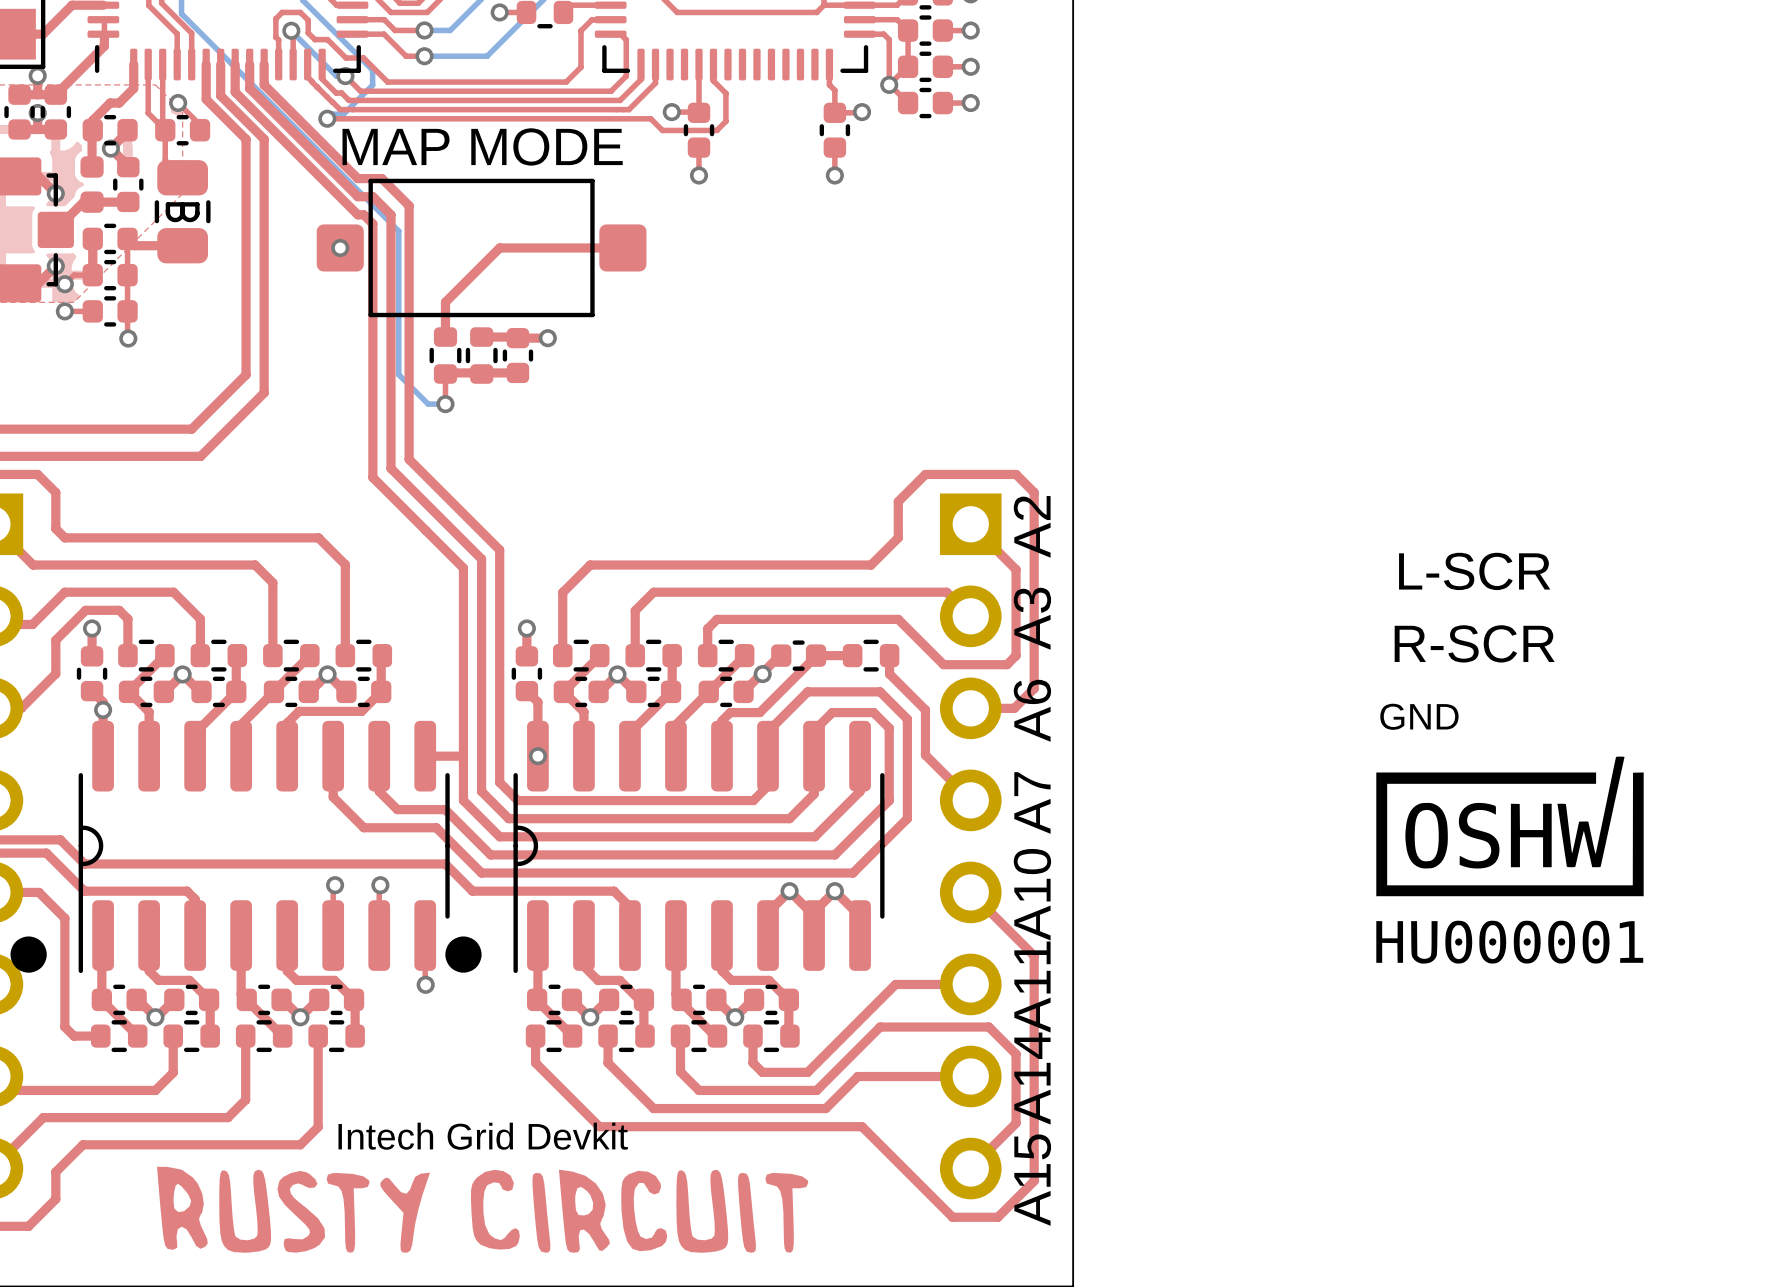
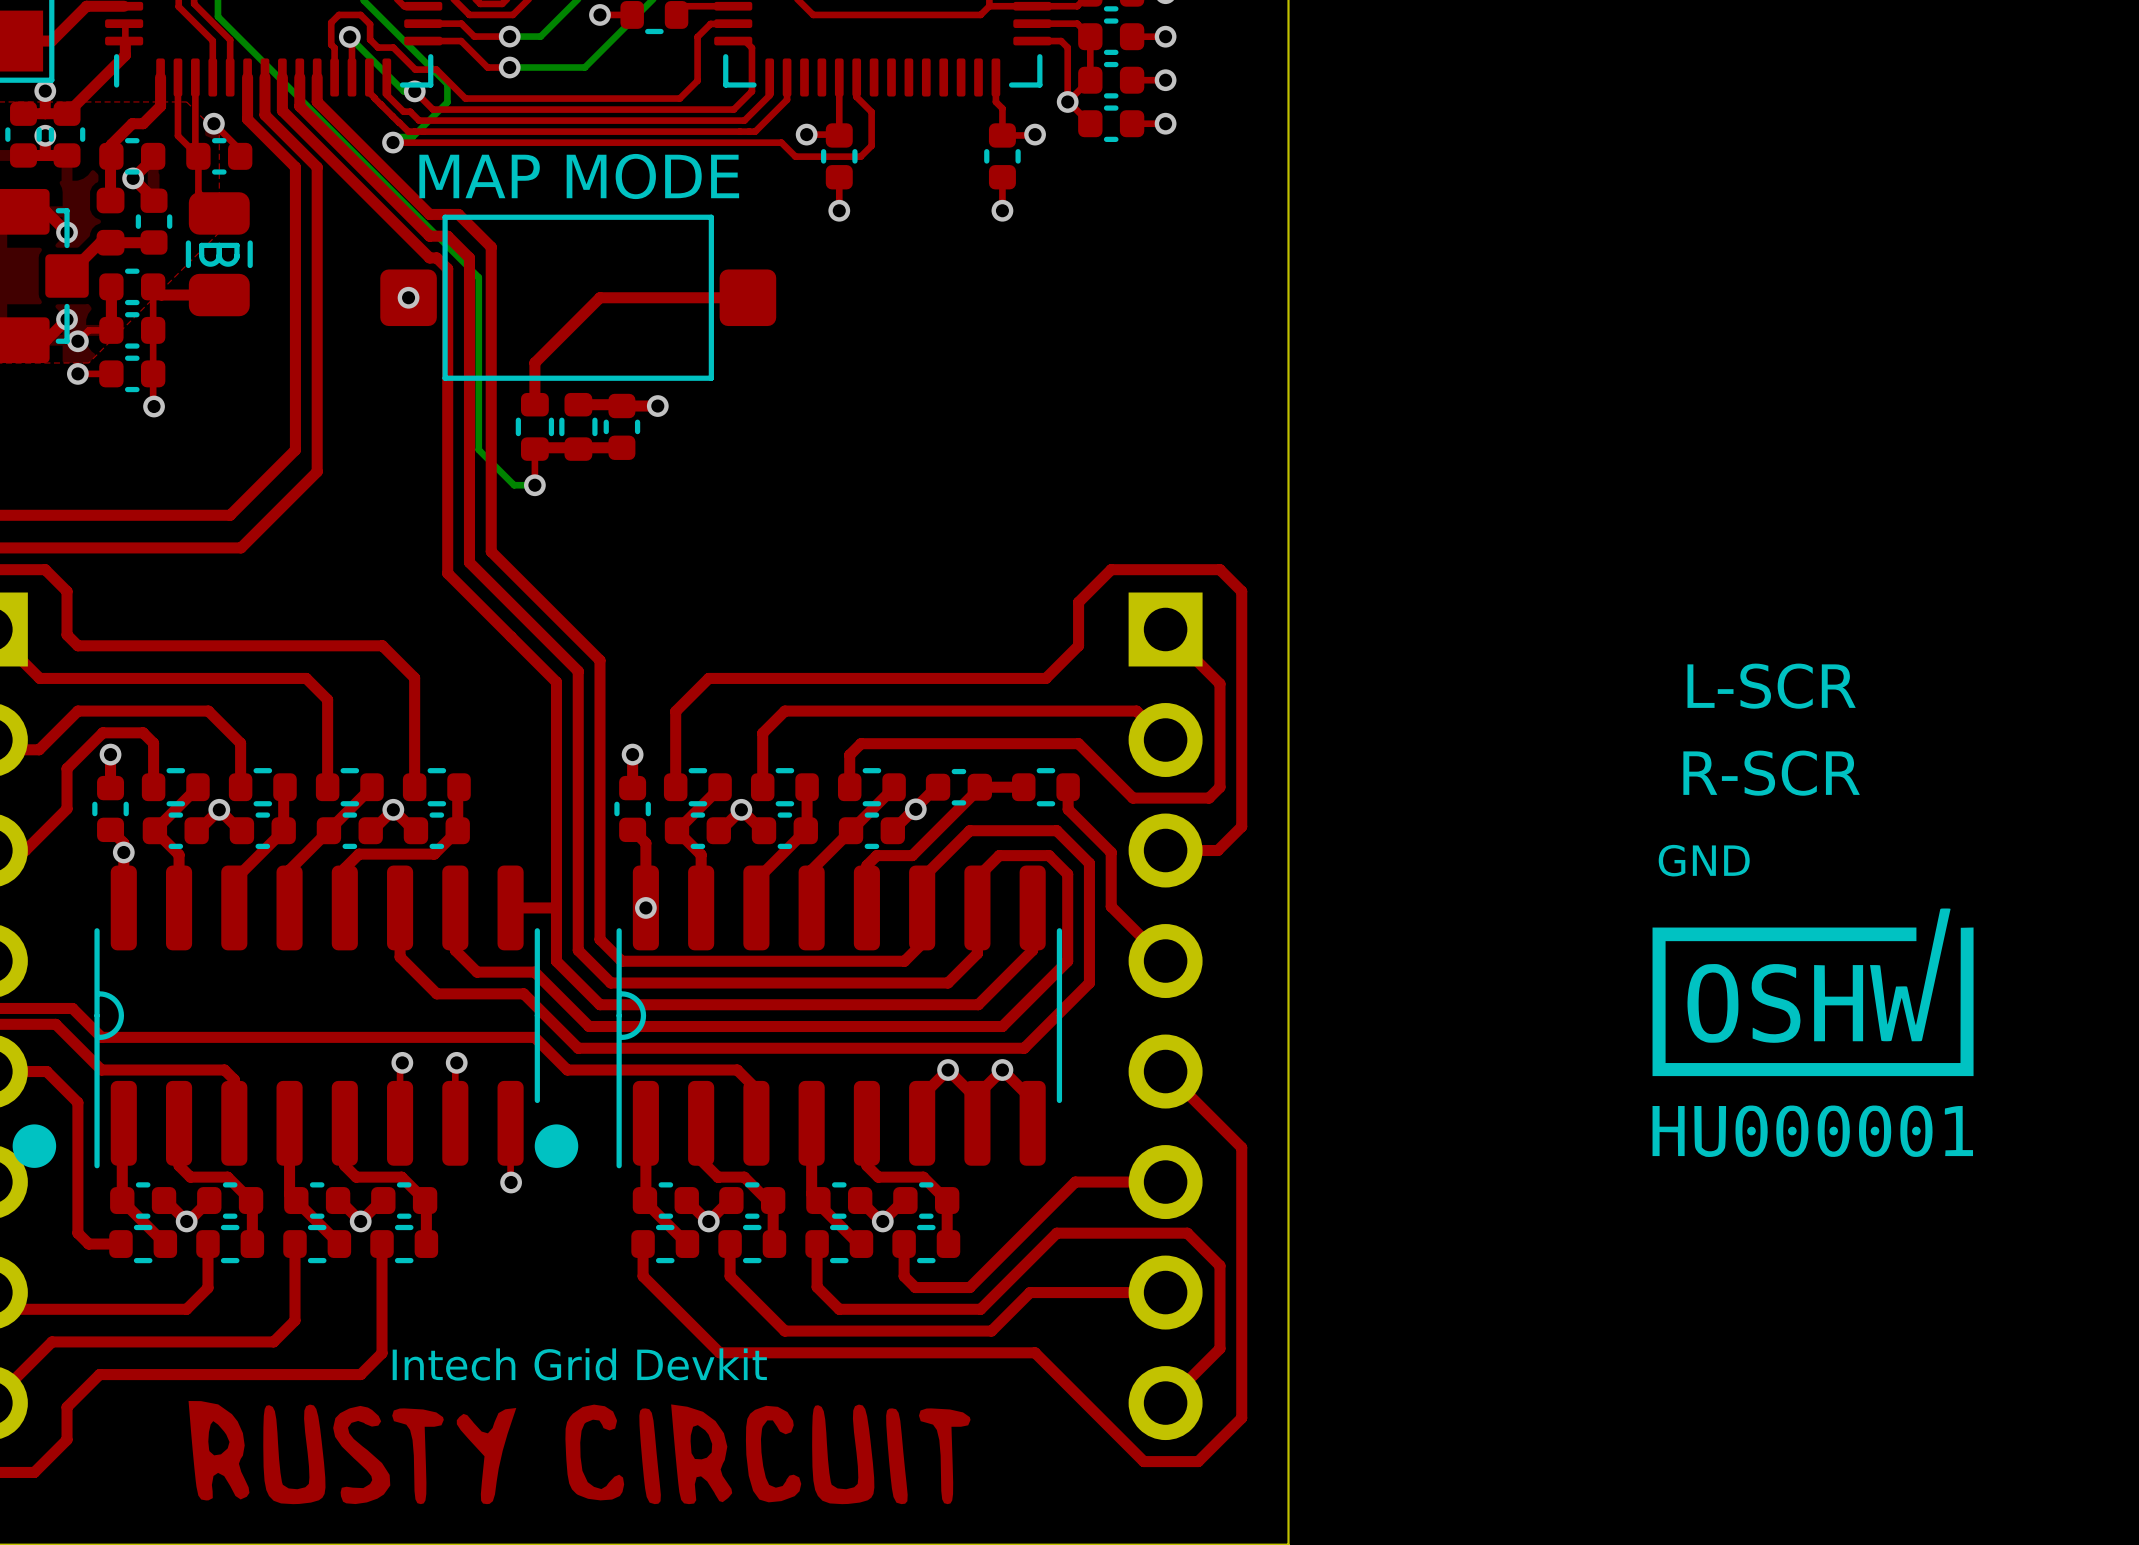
text: A2 (1032, 526) -> none
text: A3 (1032, 618) -> none
text: A6 (1032, 710) -> none
text: A7 (1032, 802) -> none
text: A10 (1032, 894) -> none
text: A11 (1032, 987) -> none
text: A14 (1032, 1078) -> none
text: A15 (1032, 1180) -> none

